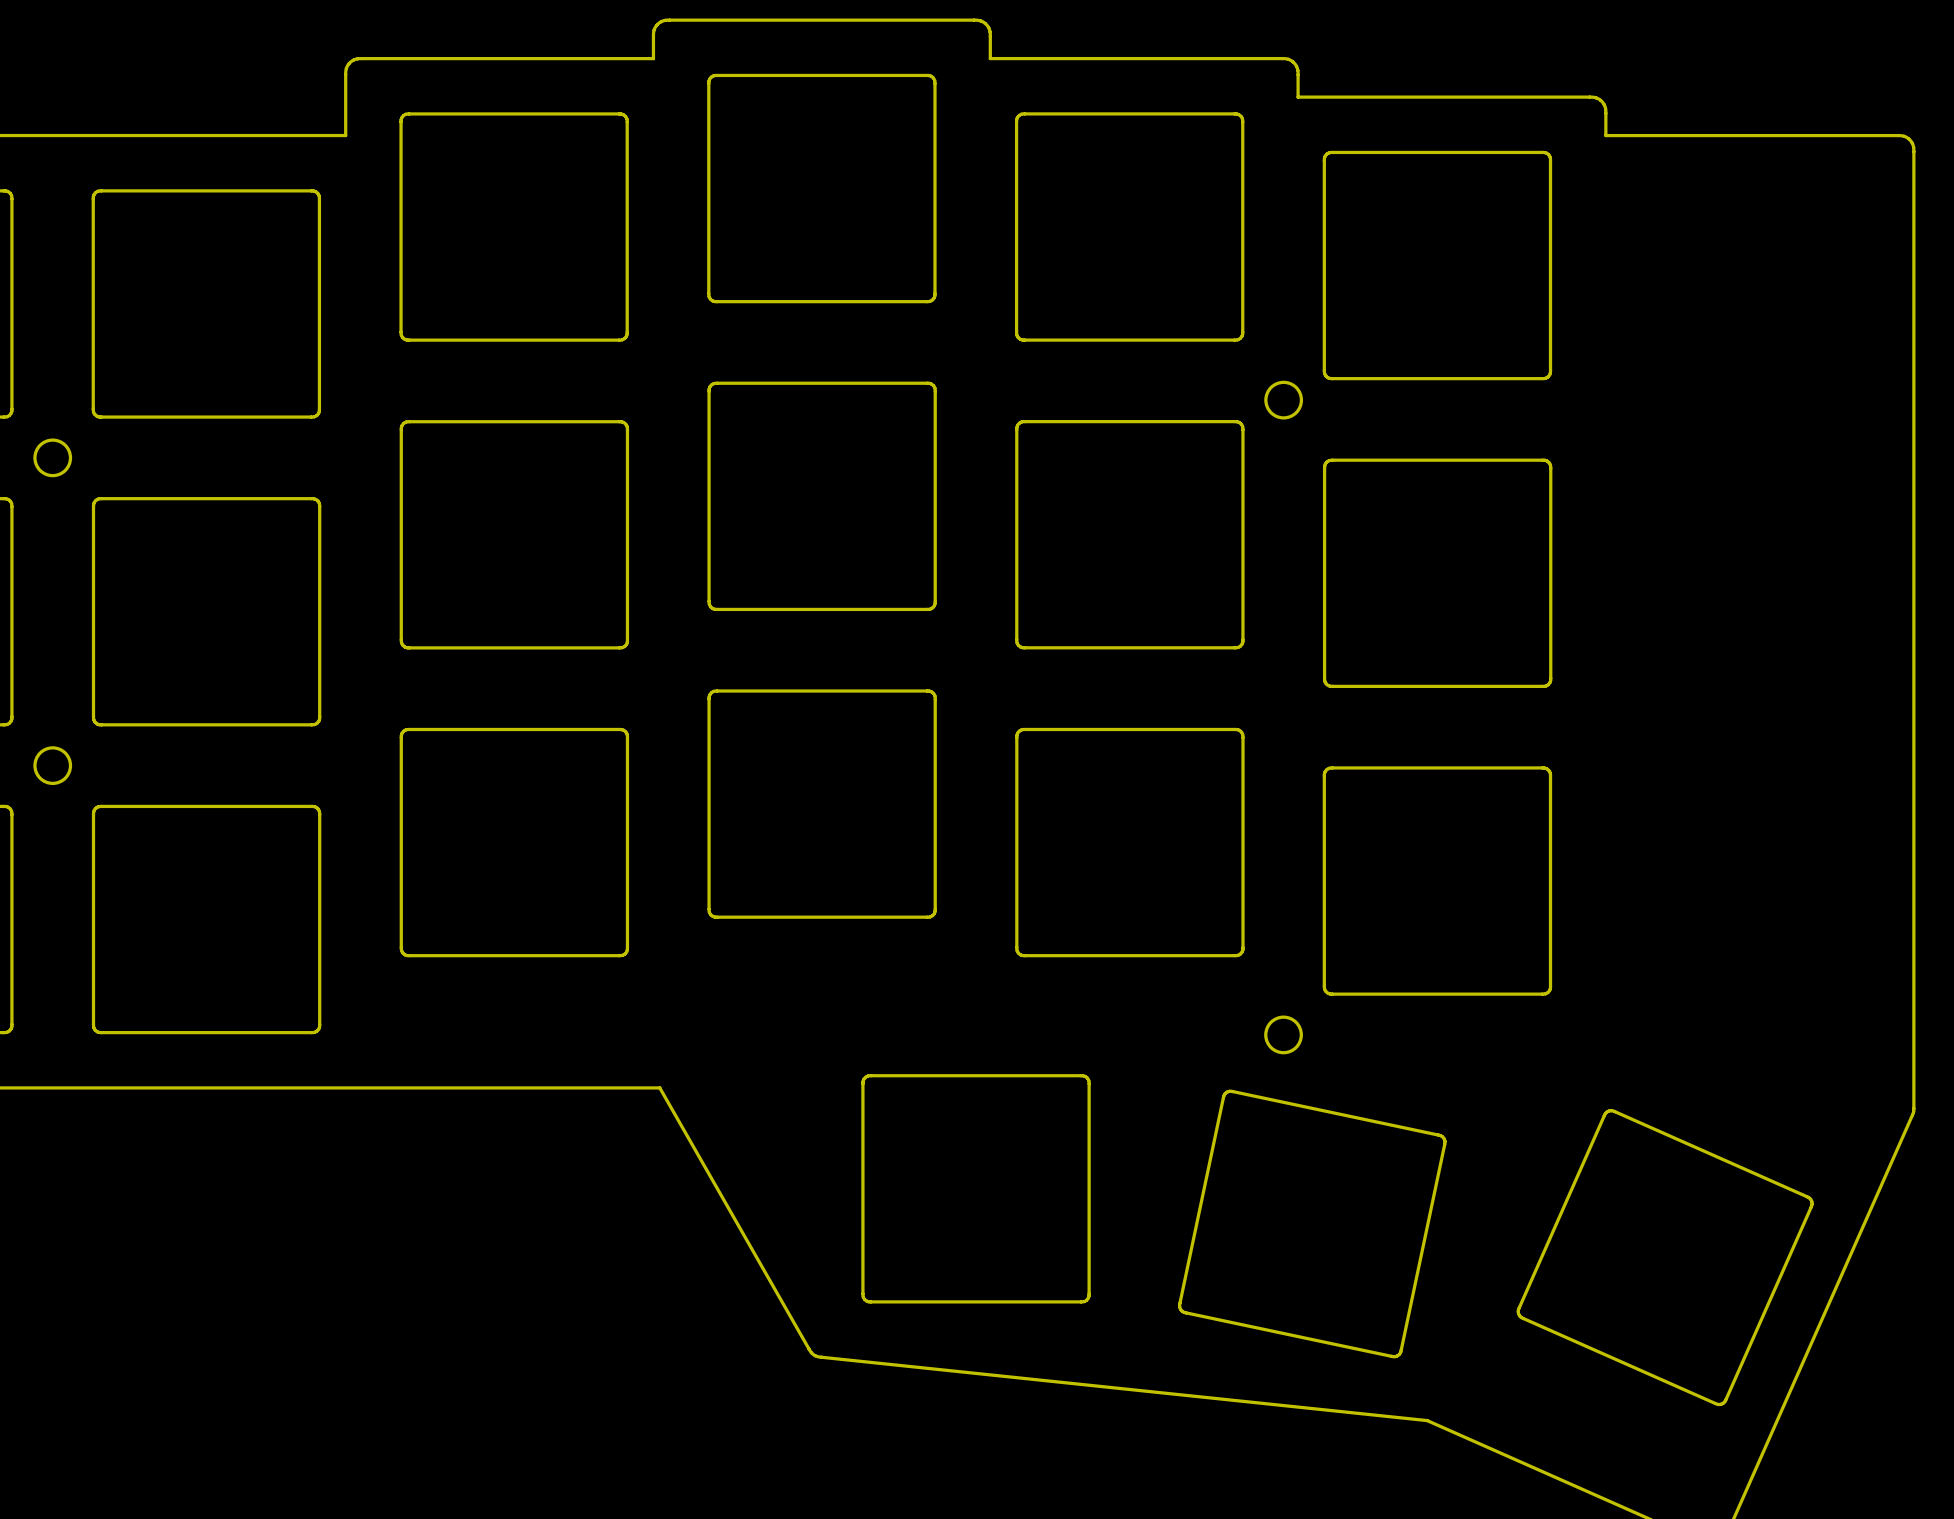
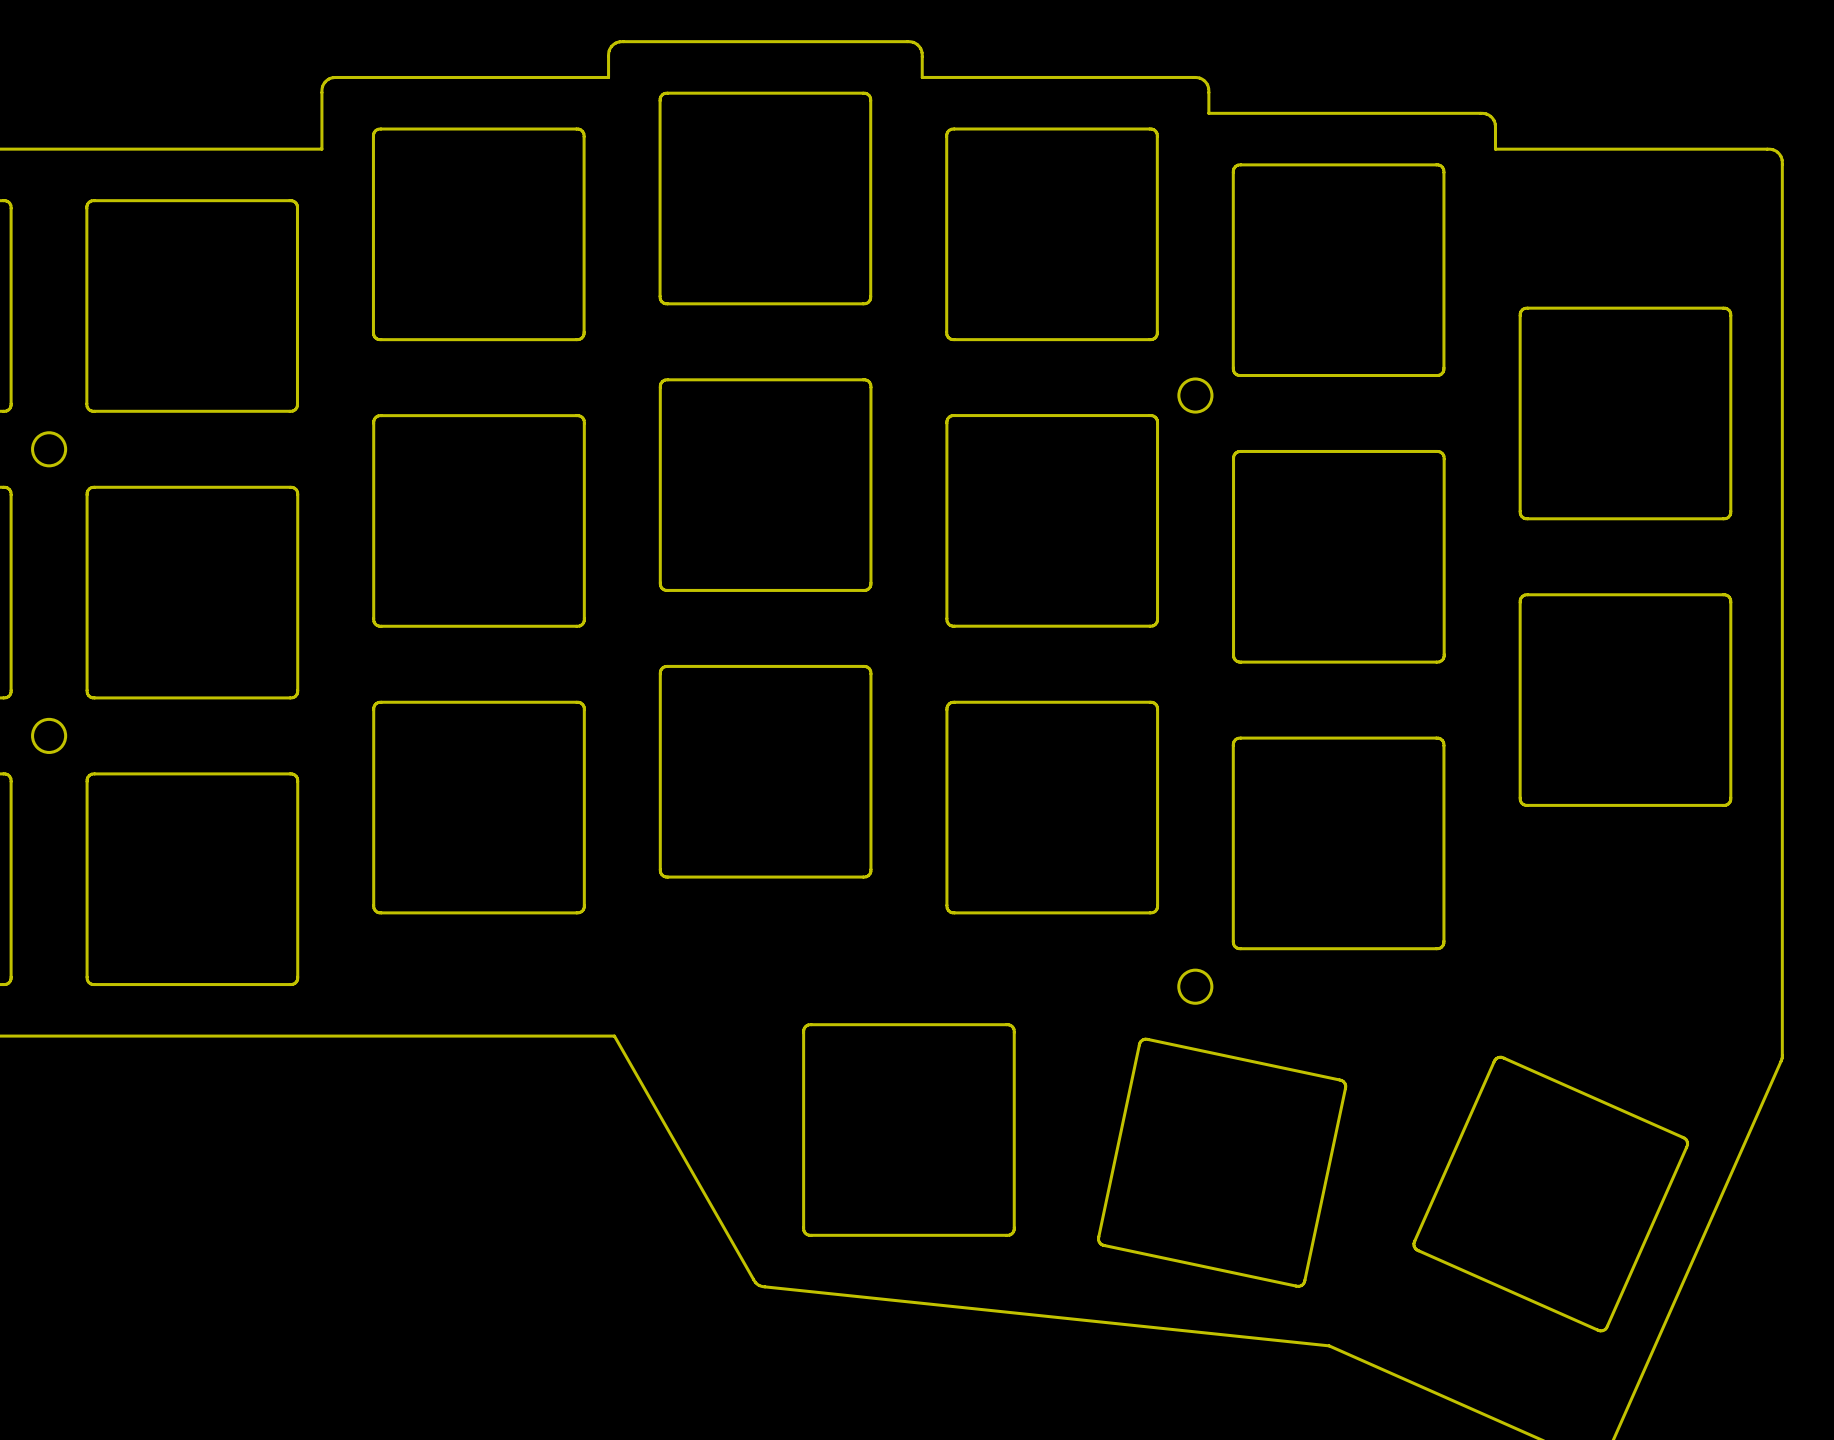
board edge: none -> (1527, 308) (1723, 308) (1728, 310) (1730, 315) (1730, 511) (1728, 516) (1723, 518) (1527, 518) (1522, 516) (1520, 511) (1520, 314) (1522, 309) (1527, 308)
board edge: none -> (1527, 594) (1723, 594) (1728, 596) (1730, 601) (1730, 798) (1728, 803) (1723, 805) (1527, 805) (1522, 803) (1520, 798) (1520, 601) (1522, 596) (1527, 594)

